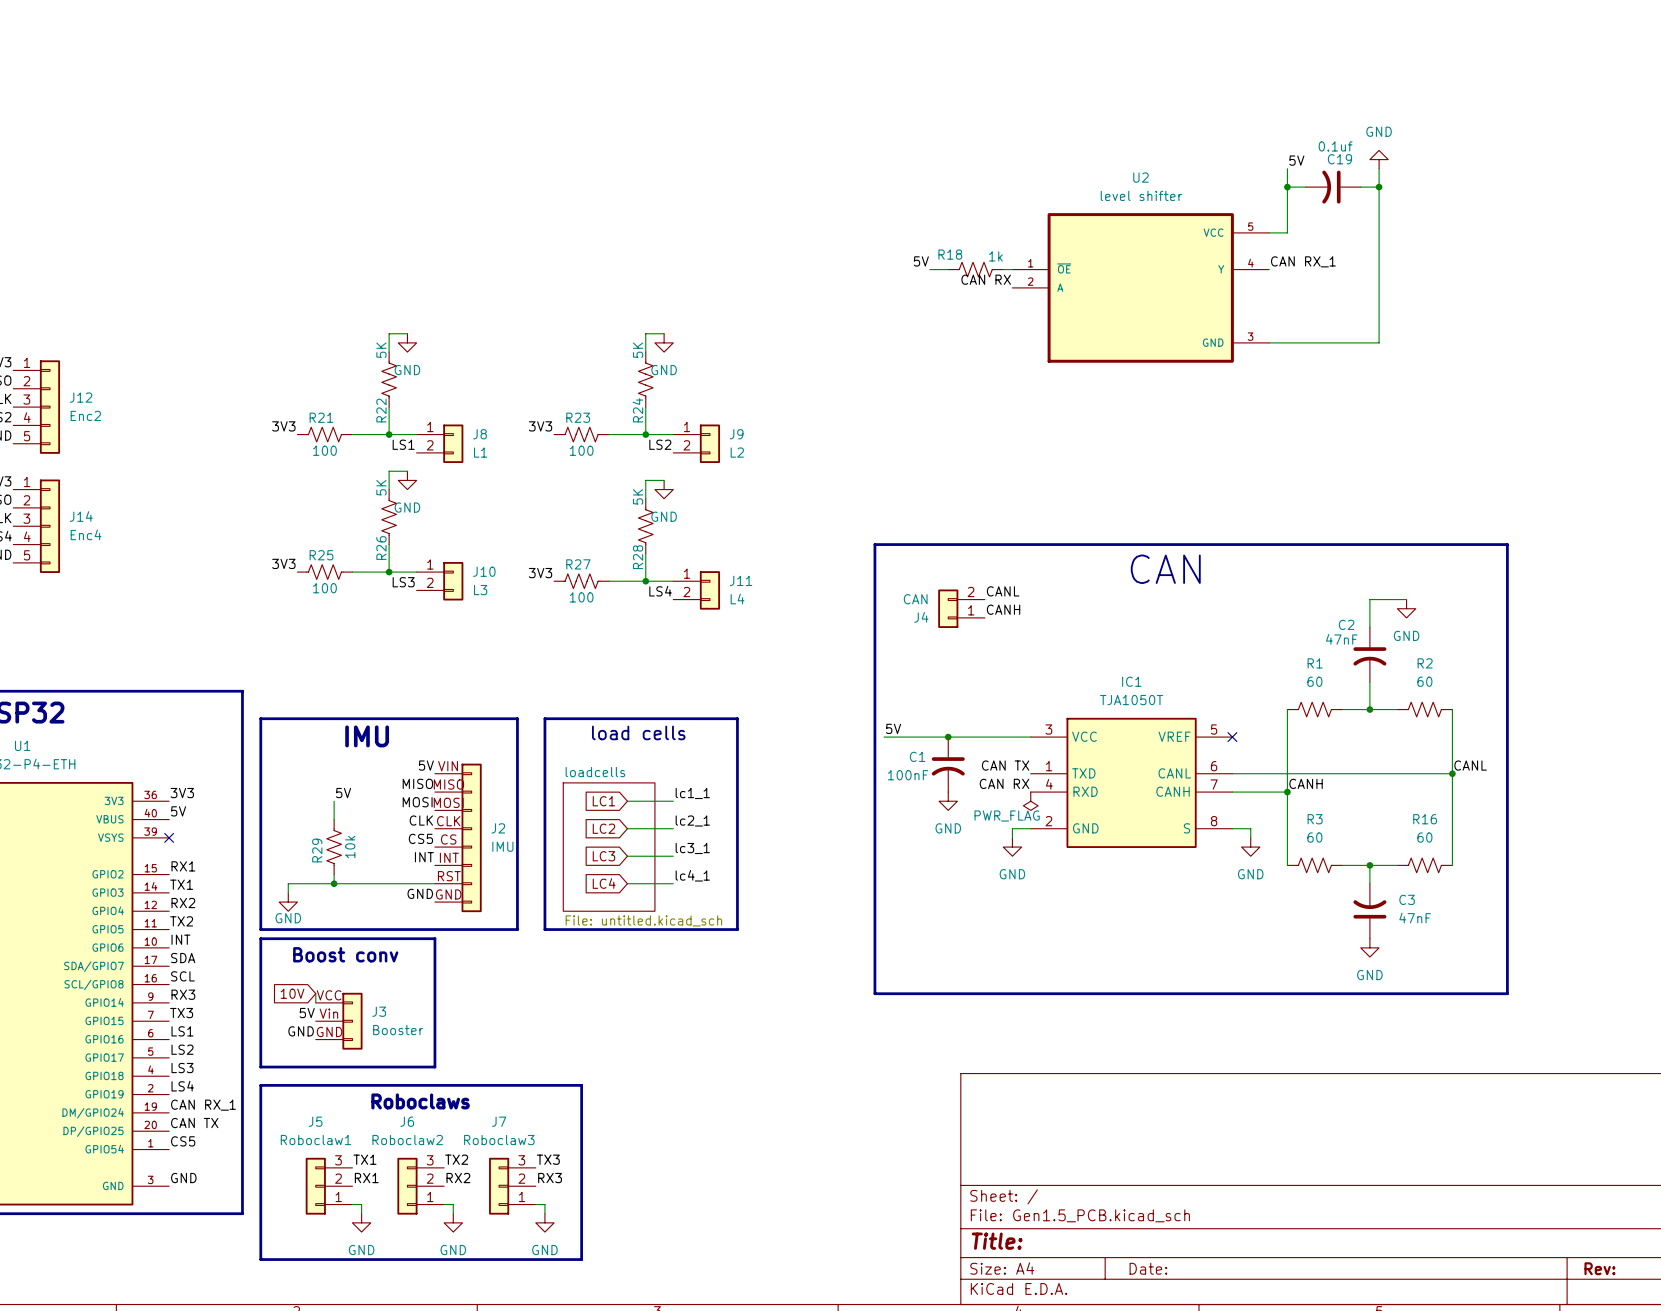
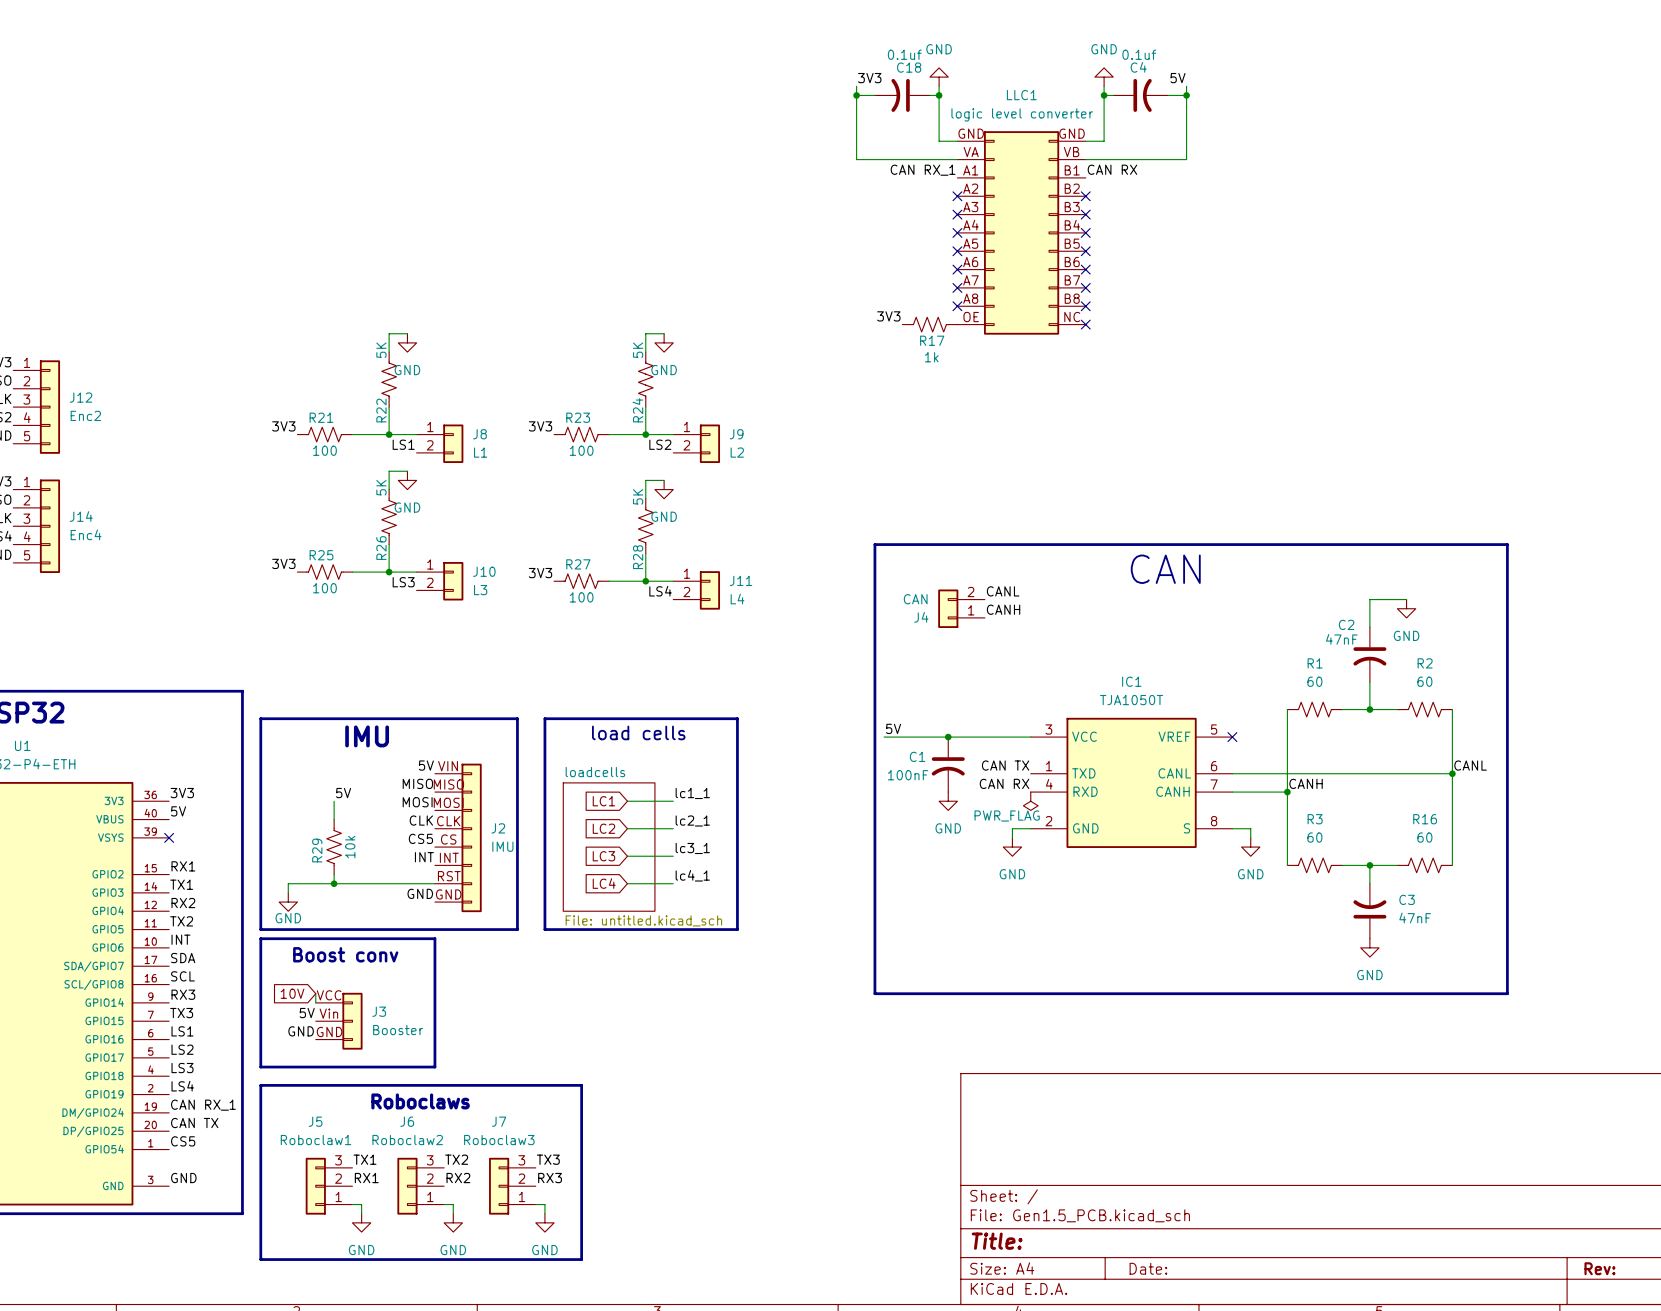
power symbol: none -> GND (939, 77)
power symbol: none -> GND (1104, 77)
label: none -> 3V3 (869, 78)
wire: none -> (856, 86) (856, 159) (957, 159)
wire: none -> (939, 86) (939, 141) (957, 141)
wire: none -> (1104, 86) (1104, 141) (1085, 141)
wire: none -> (1186, 86) (1186, 159) (1085, 159)
wire: none -> (856, 95) (874, 95)
junction: none -> (856, 95)
C18: none -> 0.1uf (902, 95)
wire: none -> (929, 95) (939, 95)
junction: none -> (939, 95)
wire: none -> (1104, 95) (1113, 95)
junction: none -> (1104, 95)
C4: none -> 0.1uf (1140, 95)
junction: none -> (1186, 95)
power symbol: GND (1379, 159) -> none
label position: 5V (1296, 160) -> 5V (1178, 78)
wire: (1287, 168) (1287, 232) (1269, 232) -> none
wire: (1379, 168) (1379, 342) (1269, 342) -> none
label: none -> CAN RX_1 (923, 170)
wire: (1287, 187) (1305, 187) -> (1168, 95) (1186, 95)
junction: (1287, 187) -> none
C19: 0.1uf (1333, 187) -> none
wire: (1360, 187) (1379, 187) -> none
junction: (1379, 187) -> none
no-connect mark: none -> (957, 196)
no-connect mark: none -> (1085, 196)
no-connect mark: none -> (957, 214)
no-connect mark: none -> (1085, 214)
no-connect mark: none -> (957, 232)
LLC1: none -> logic level converter (1021, 232)
no-connect mark: none -> (1085, 232)
no-connect mark: none -> (957, 251)
no-connect mark: none -> (1085, 251)
label: 5V (921, 261) -> none
label: CAN RX_1 (1303, 261) -> none
wire: (929, 269) (948, 269) -> none
no-connect mark: none -> (957, 269)
R18: 1k (975, 269) -> none
no-connect mark: none -> (1085, 269)
label position: CAN RX (986, 279) -> CAN RX (1112, 169)
no-connect mark: none -> (957, 287)
no-connect mark: none -> (1085, 287)
U2: level shifter (1140, 287) -> none
no-connect mark: none -> (957, 306)
no-connect mark: none -> (1085, 306)
label: none -> 3V3 (888, 316)
R17: none -> 1k (929, 324)
no-connect mark: none -> (1085, 324)

